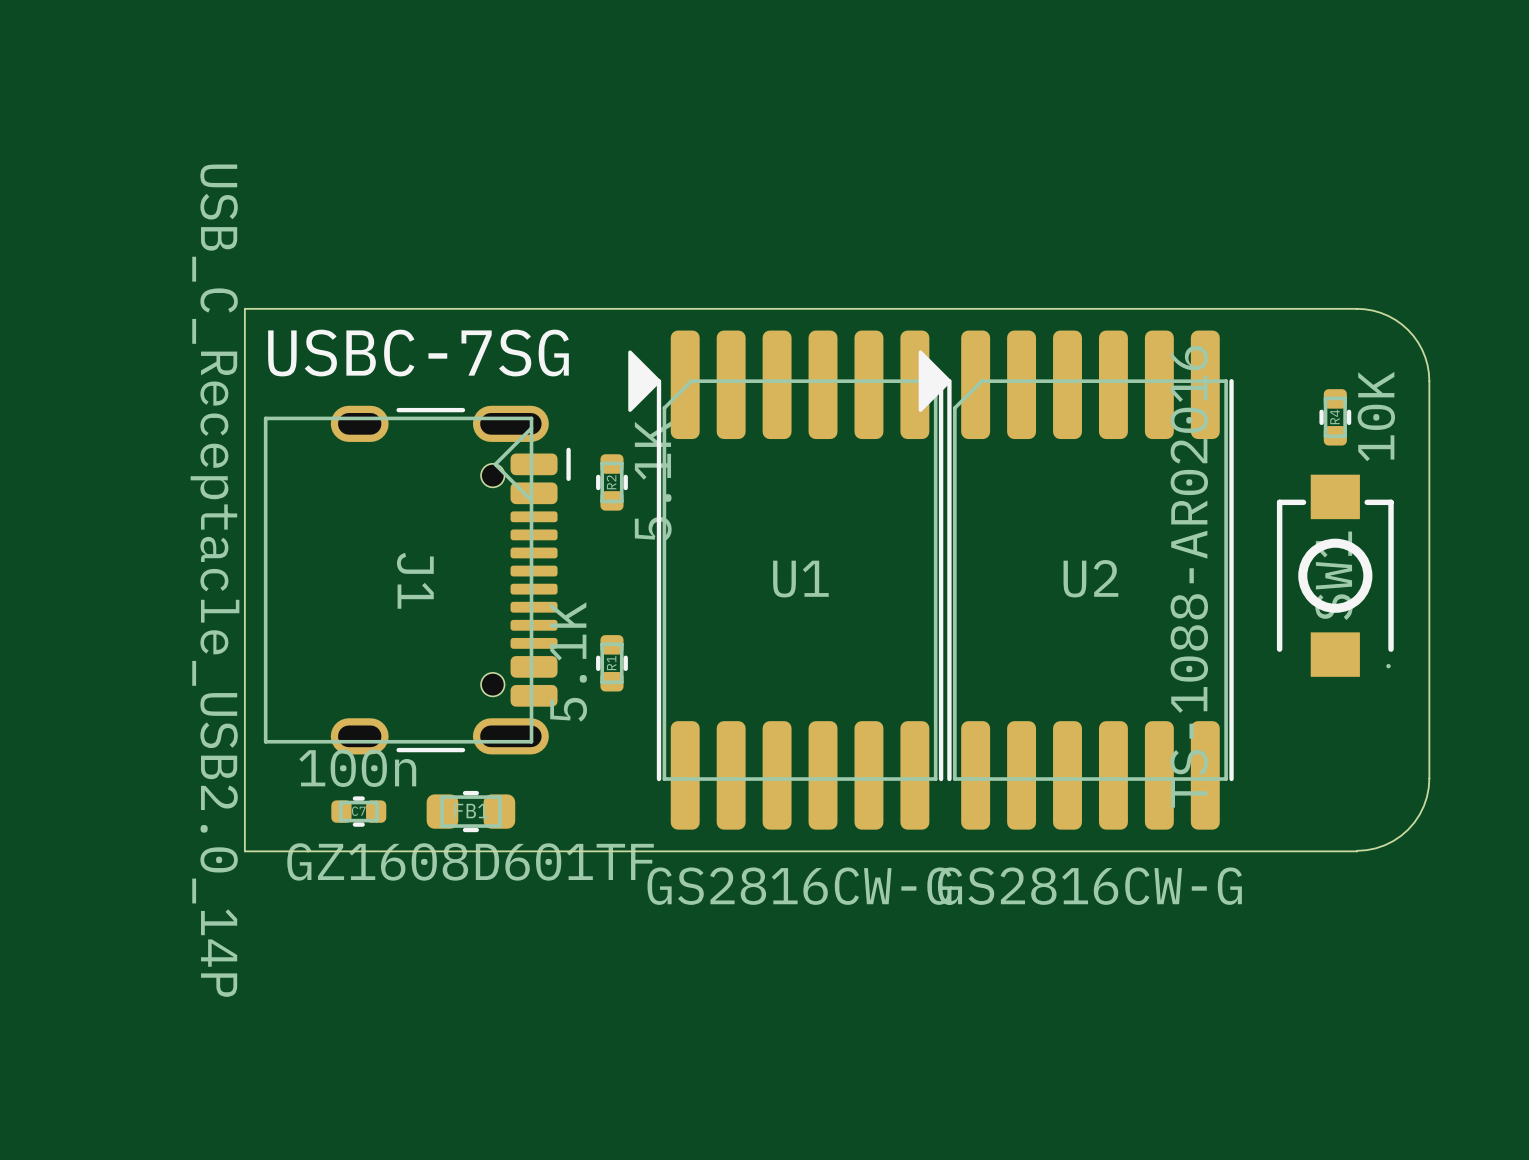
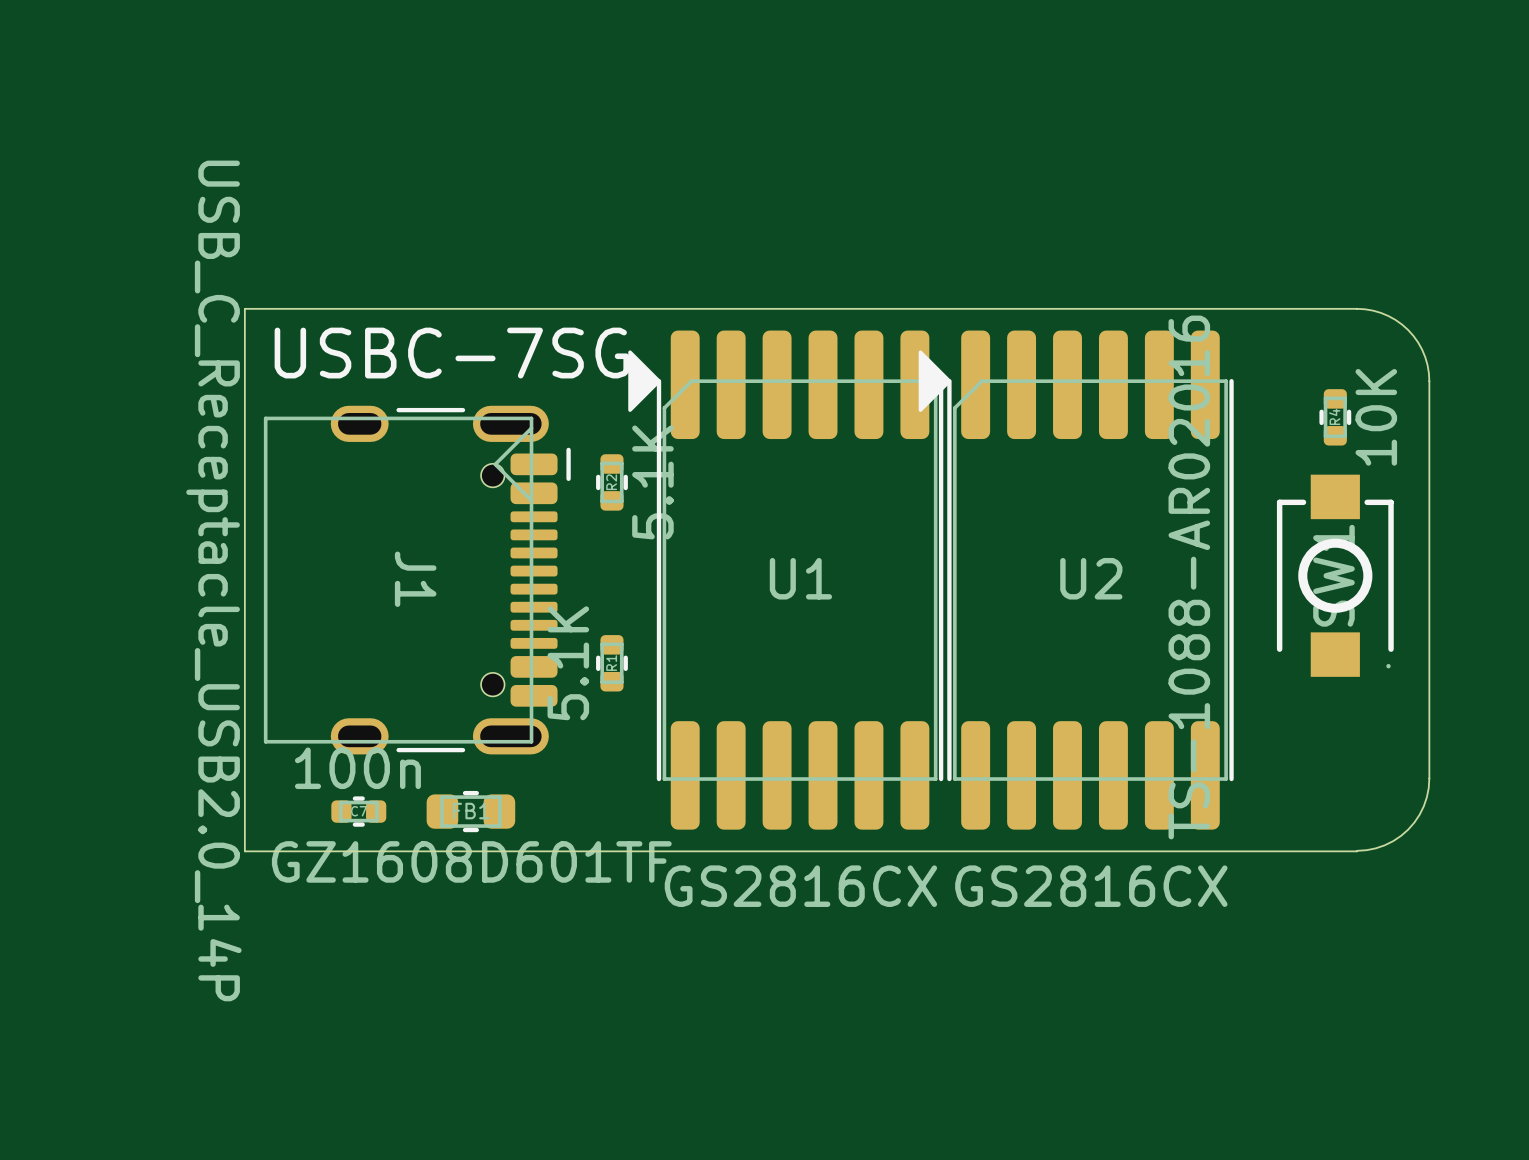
U1 value: GS2816CW-G (799, 886) -> GS2816CX (800, 886)
U2 value: GS2816CW-G (1089, 886) -> GS2816CX (1091, 886)

